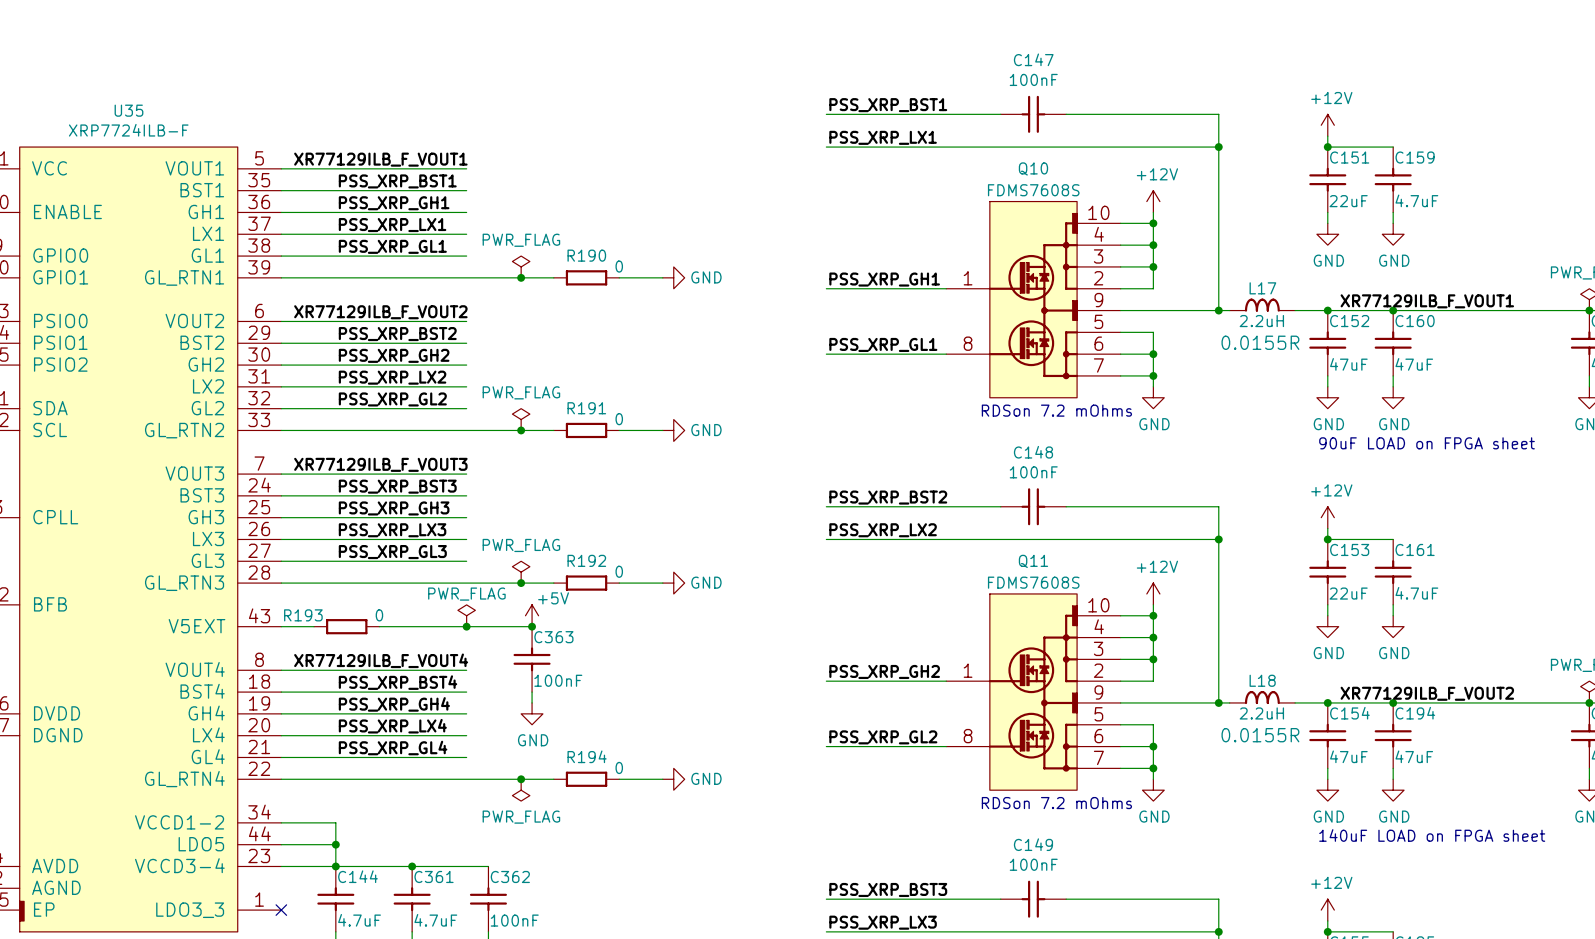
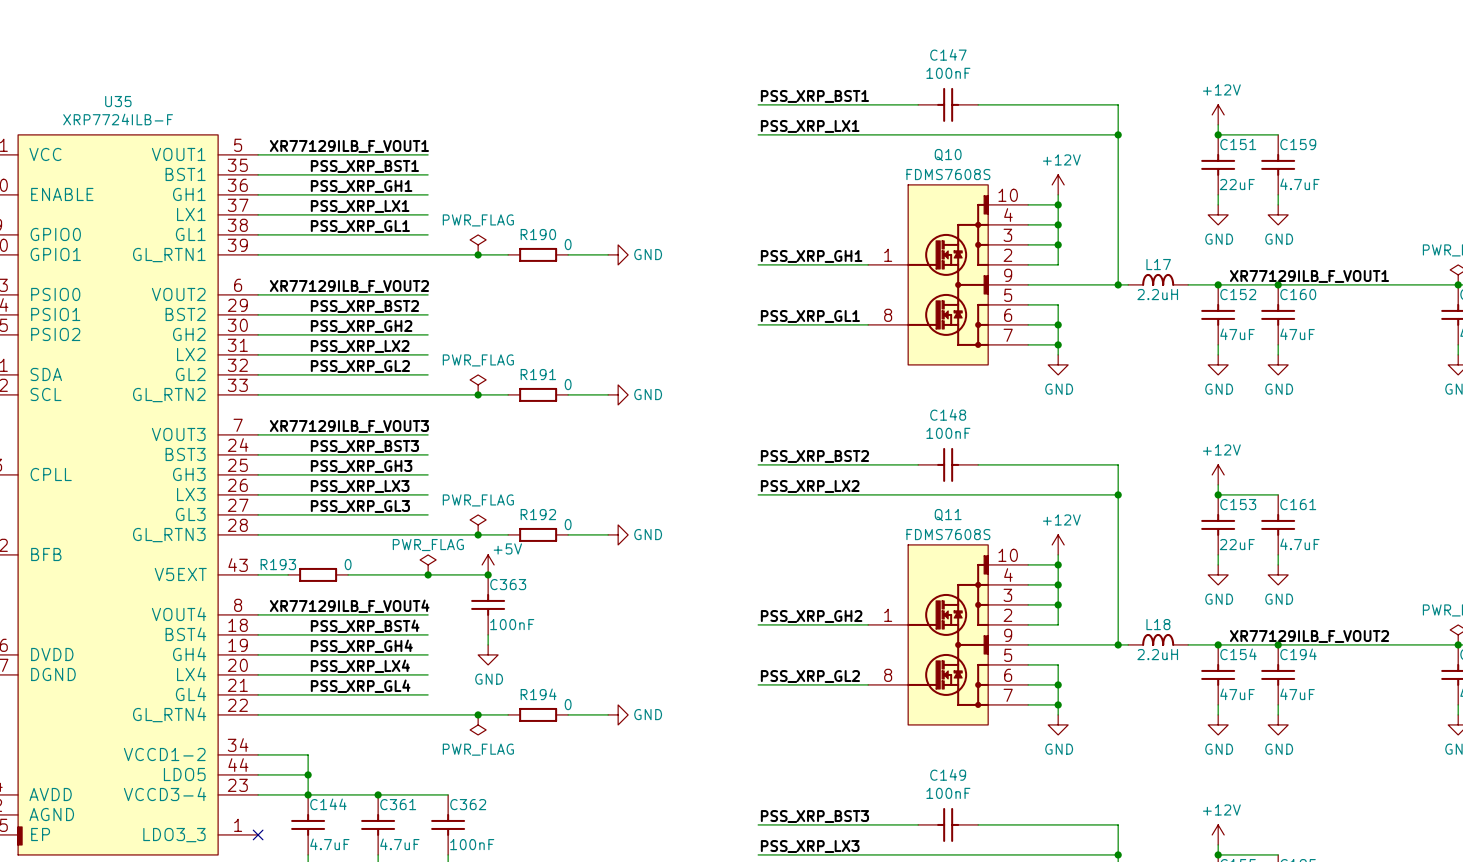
L17 text: 0.0155R (1260, 342) -> none
text: RDSon 7.2 mOhms (1056, 410) -> none
text: 90uF LOAD on FPGA sheet (1427, 443) -> none
L18 text: 0.0155R (1260, 735) -> none
text: RDSon 7.2 mOhms (1056, 803) -> none
text: 140uF LOAD on FPGA sheet (1432, 835) -> none

